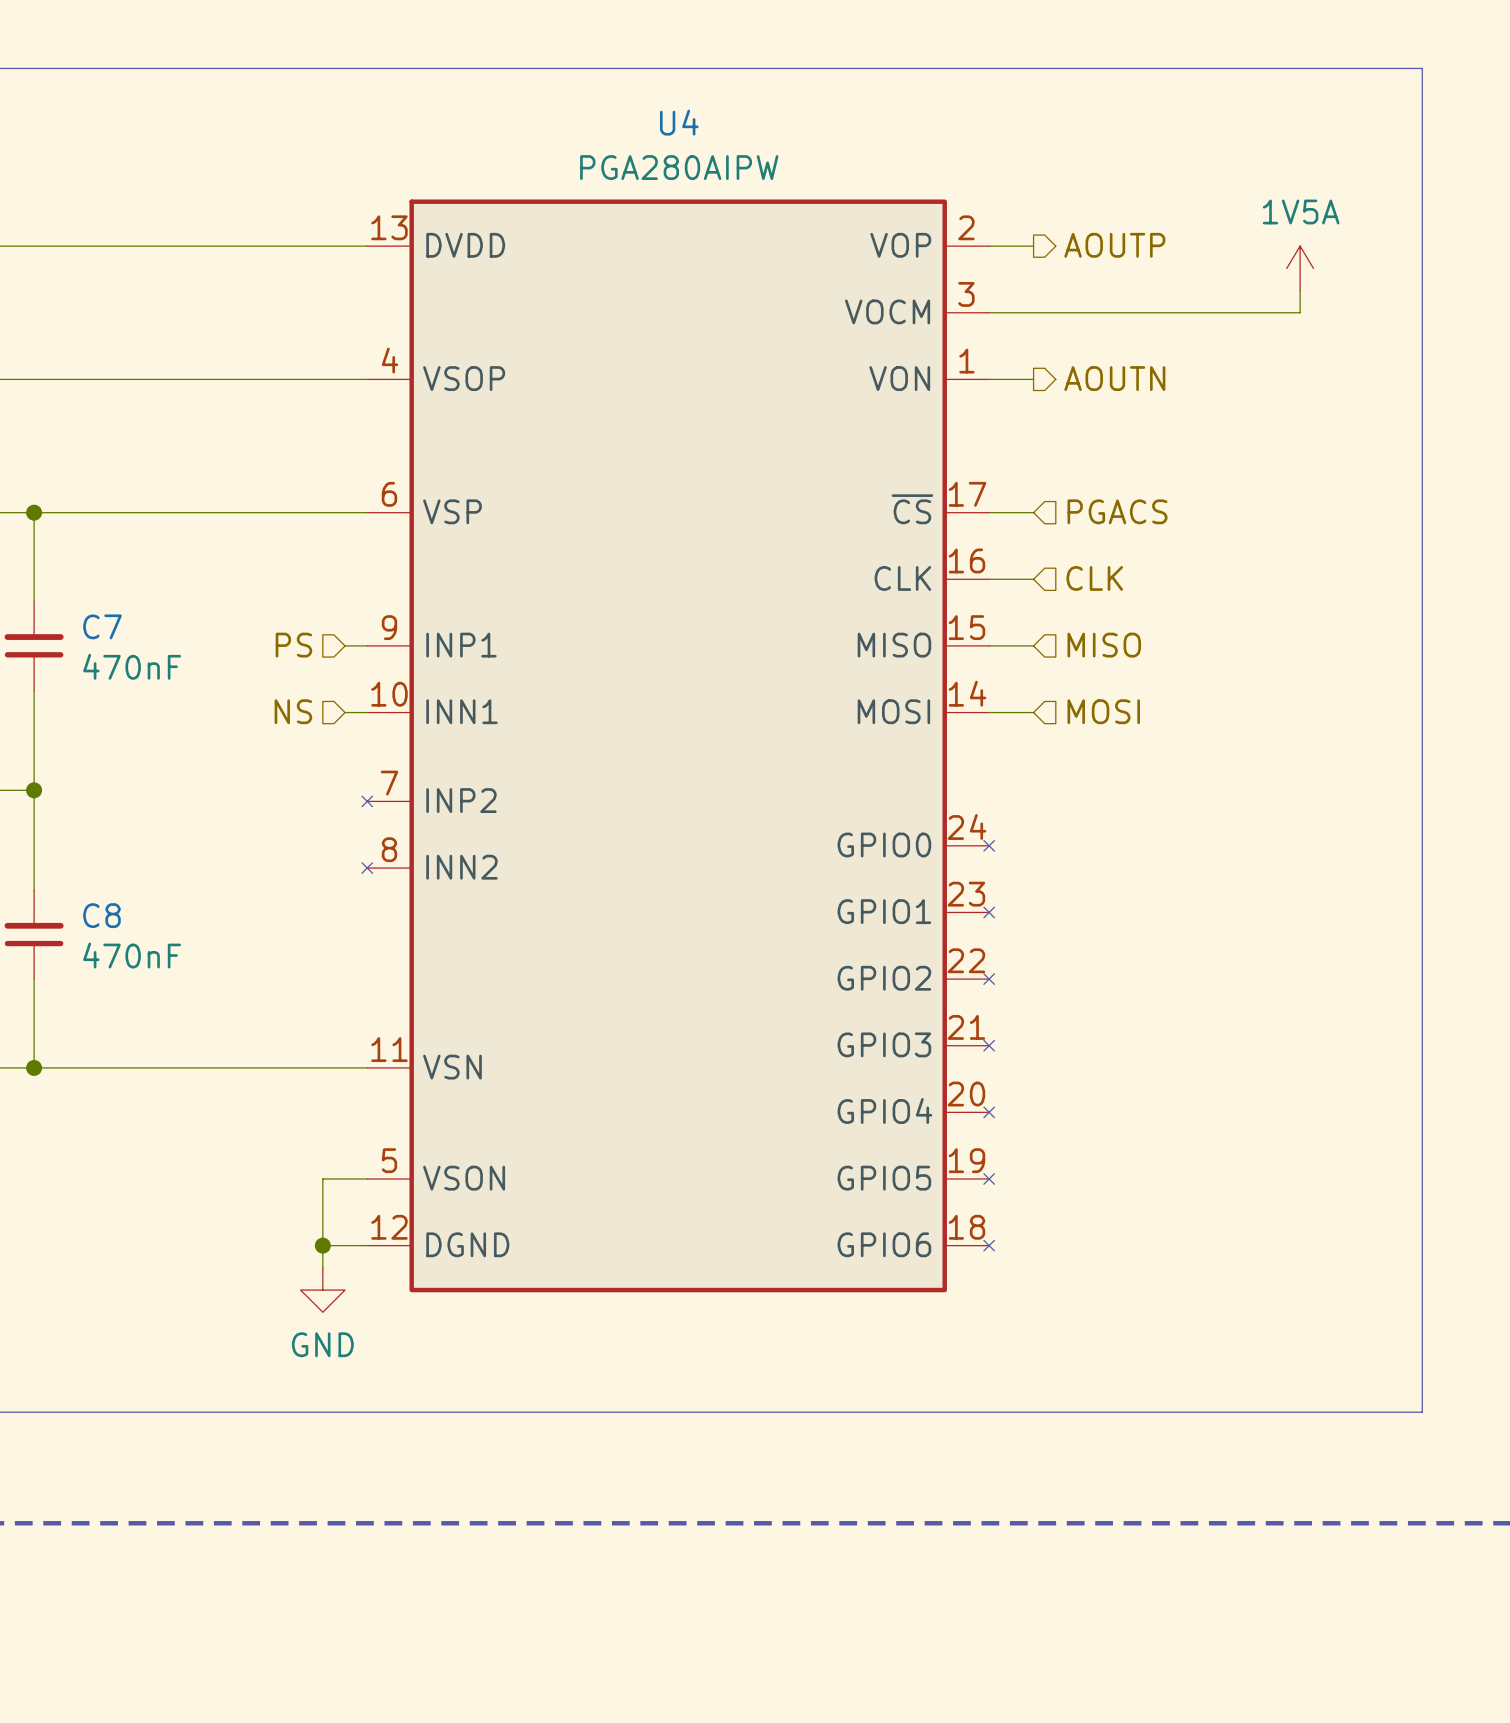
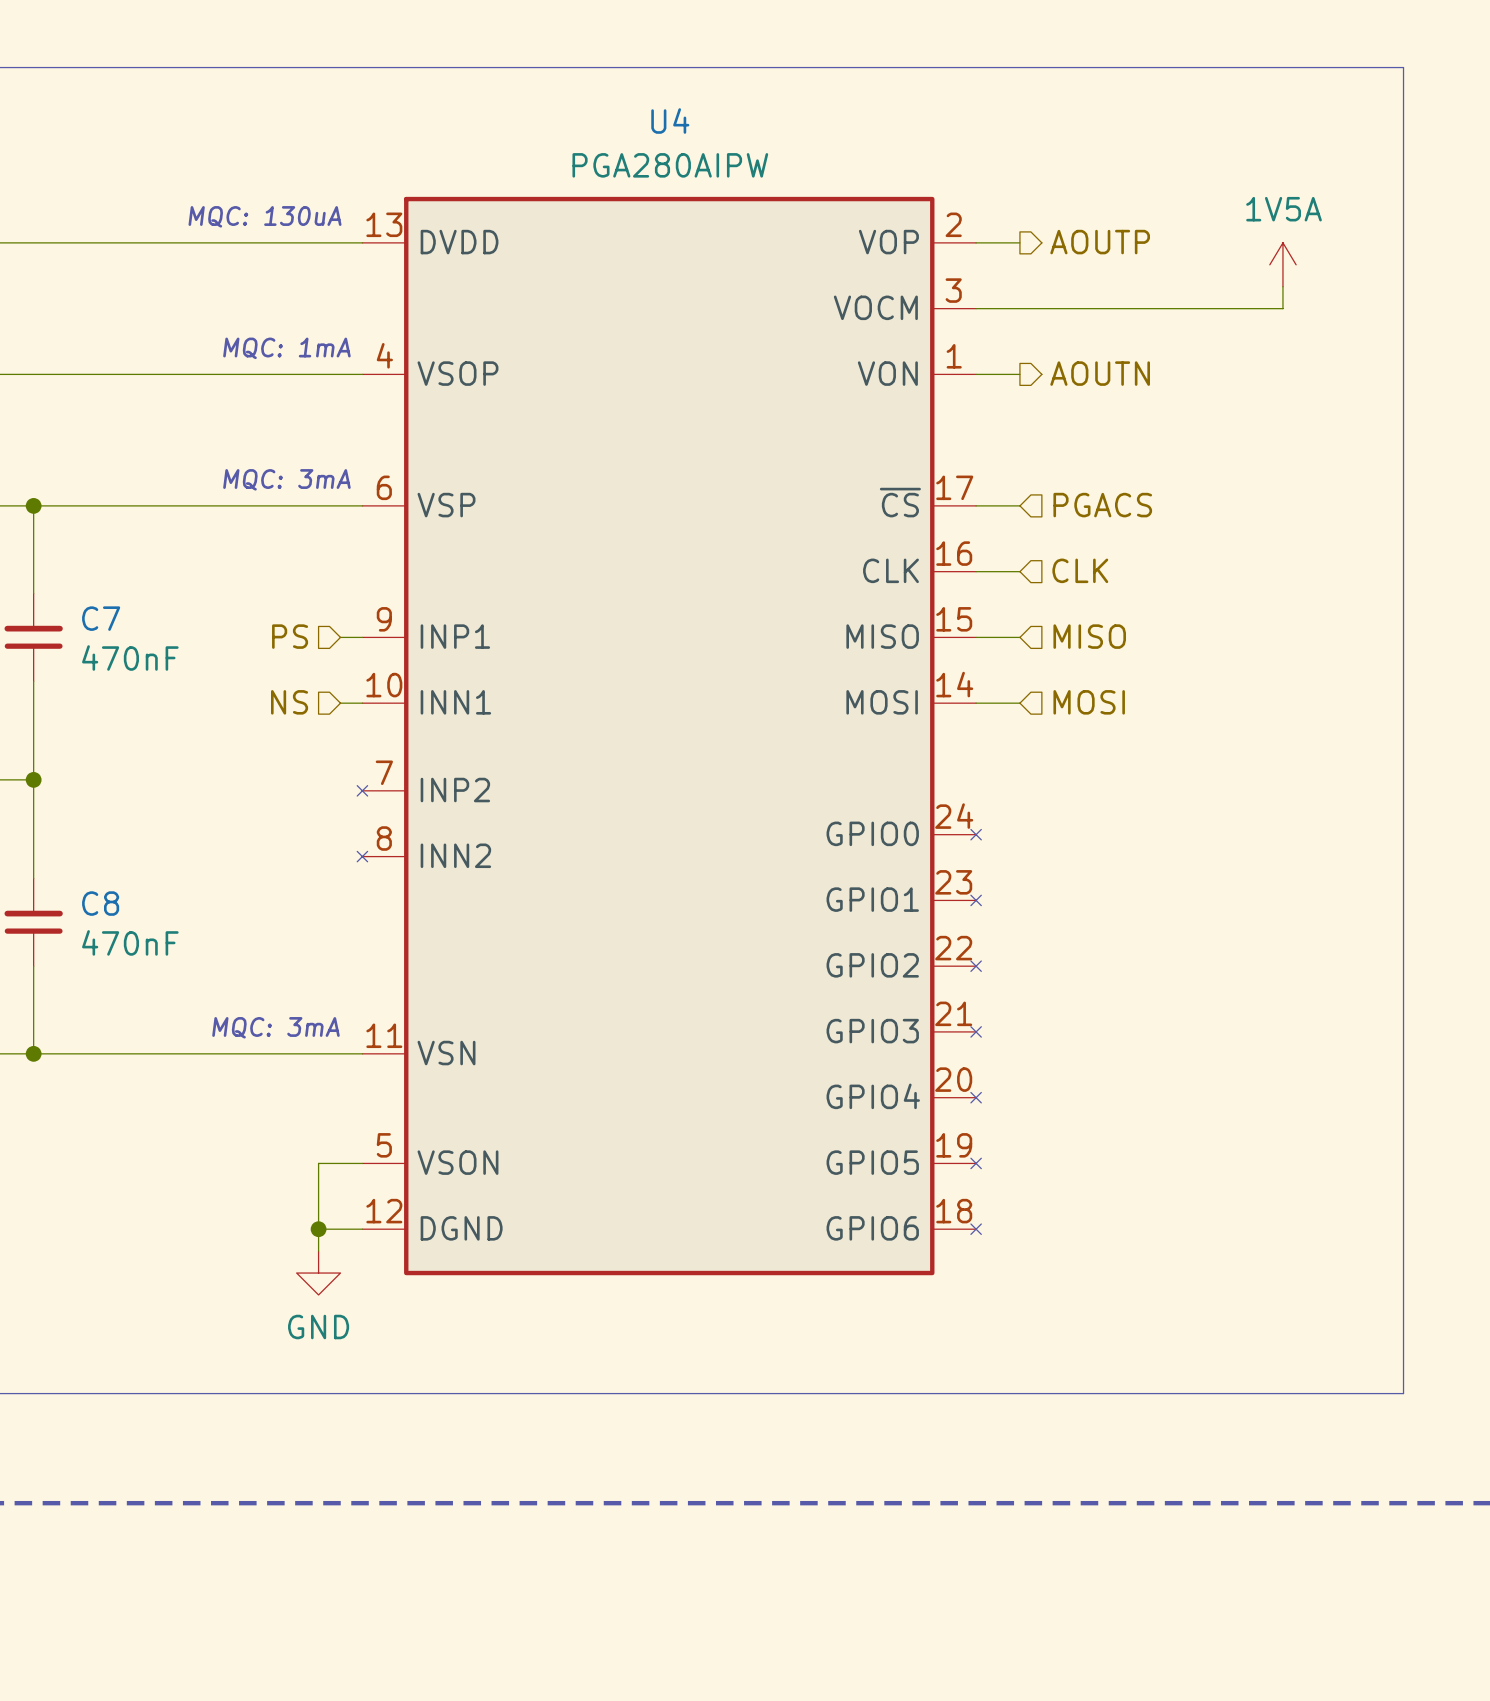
text: none -> MQC: 130uA (265, 216)
text: none -> MQC: 1mA (286, 348)
text: none -> MQC: 3mA (286, 479)
text: none -> MQC: 3mA (275, 1027)

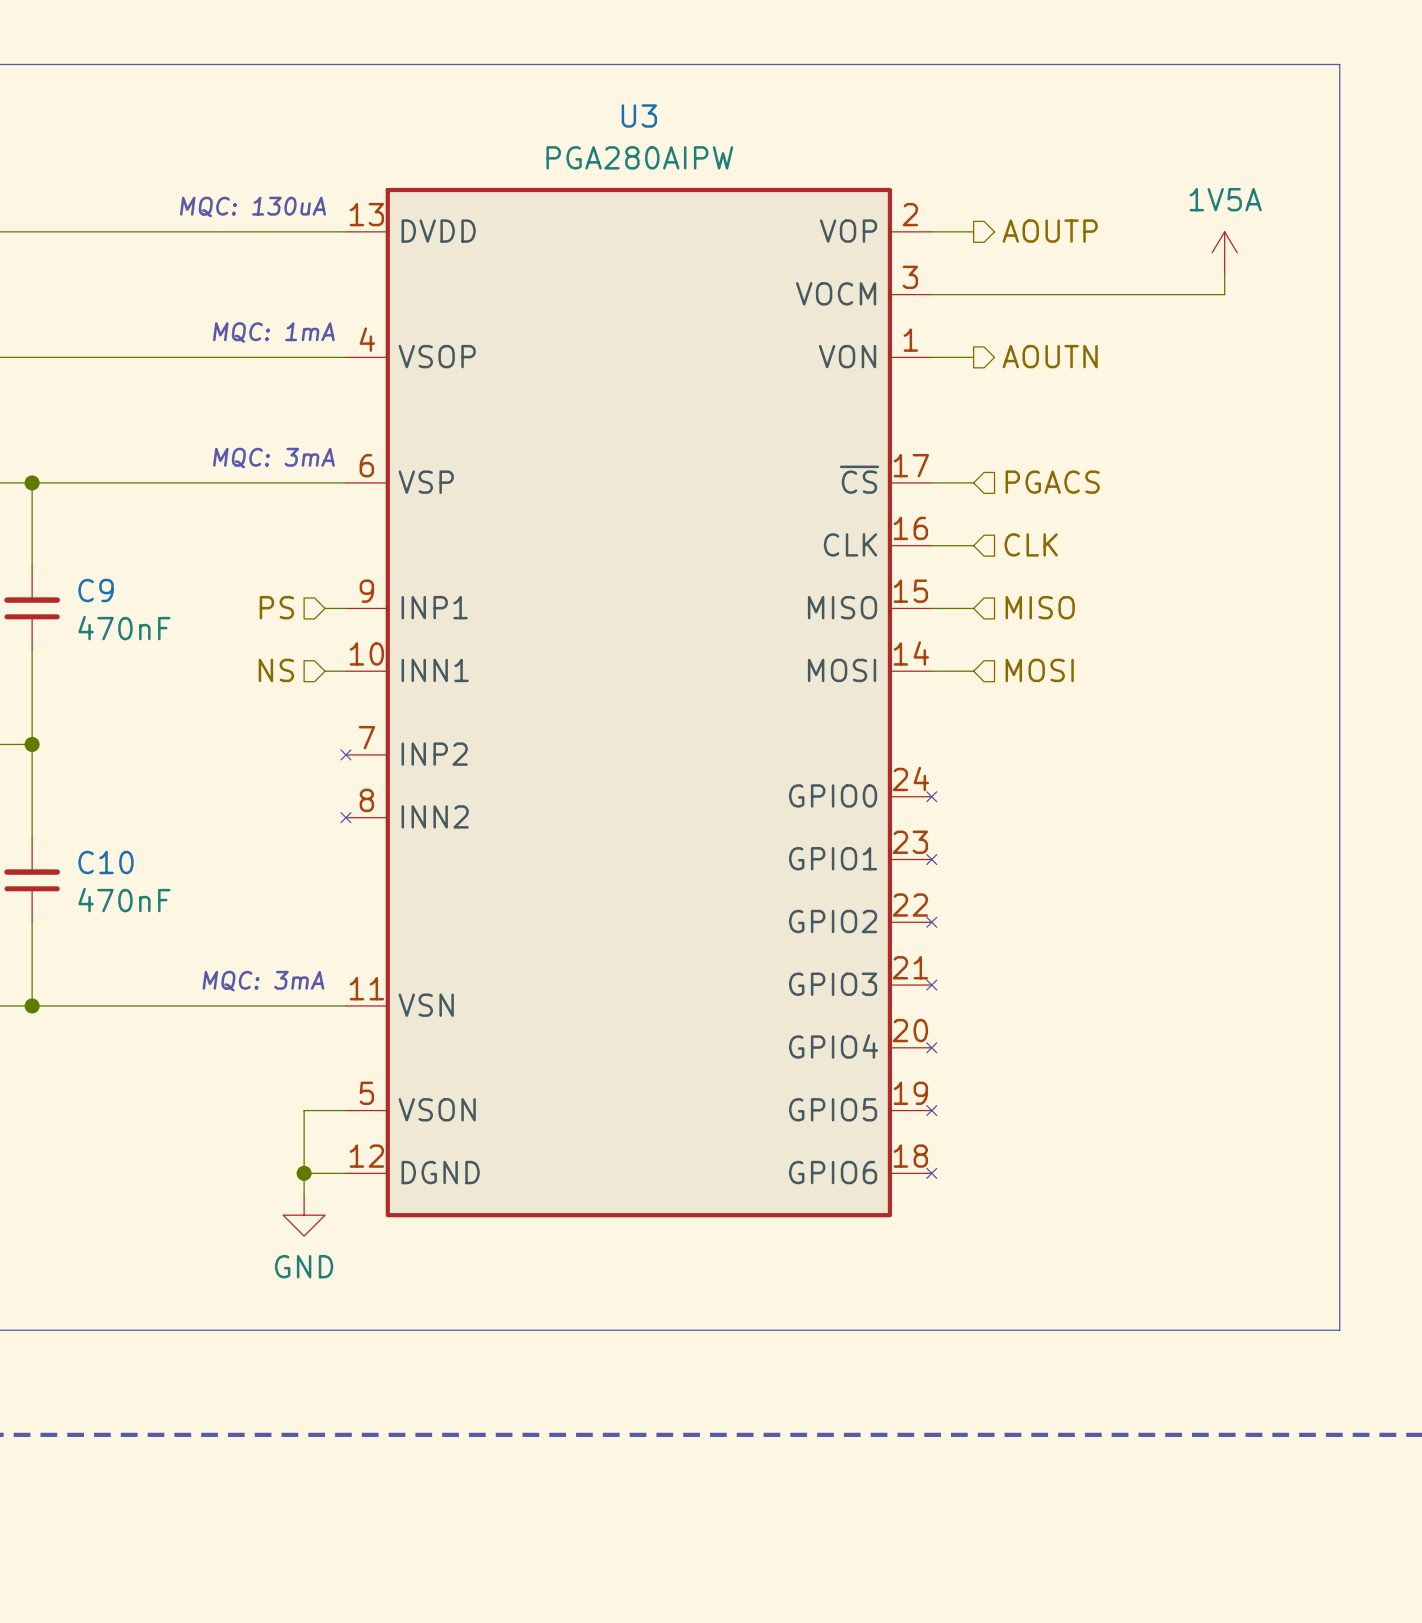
U4 name: U4 (670, 121) -> U3 (639, 116)
C7 name: C7 (101, 618) -> C9 (96, 590)
C8 name: C8 (100, 903) -> C10 (106, 862)

